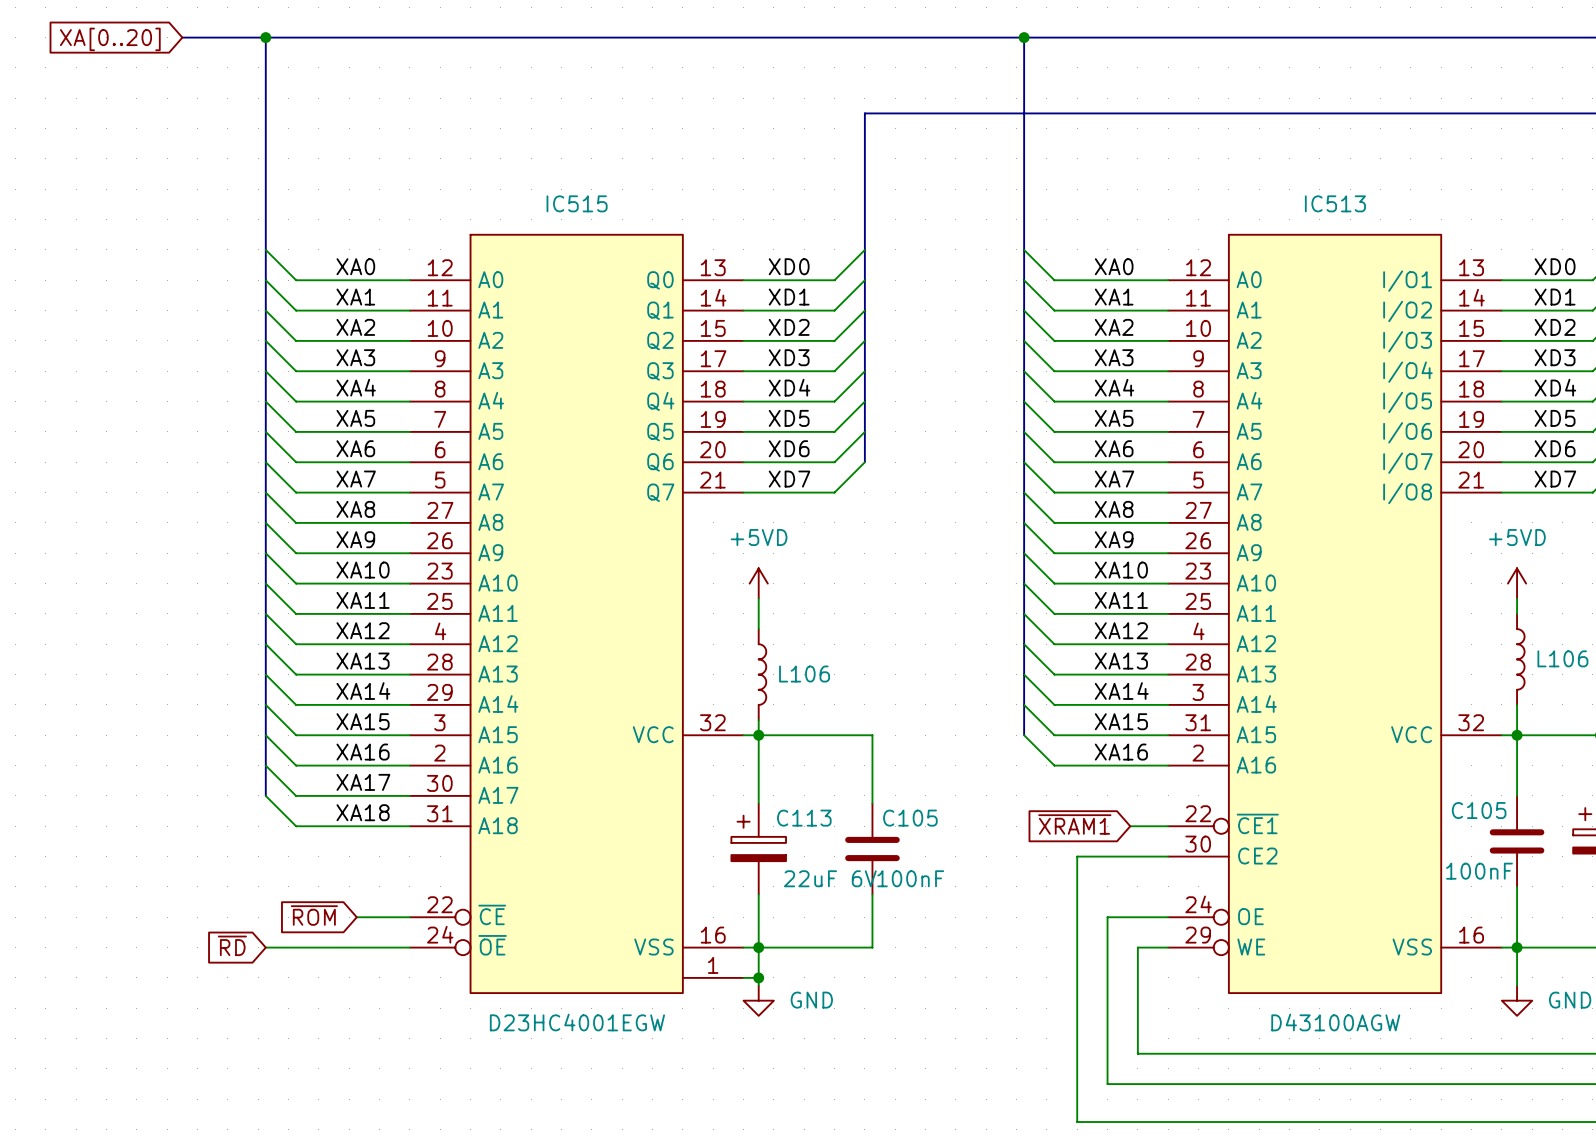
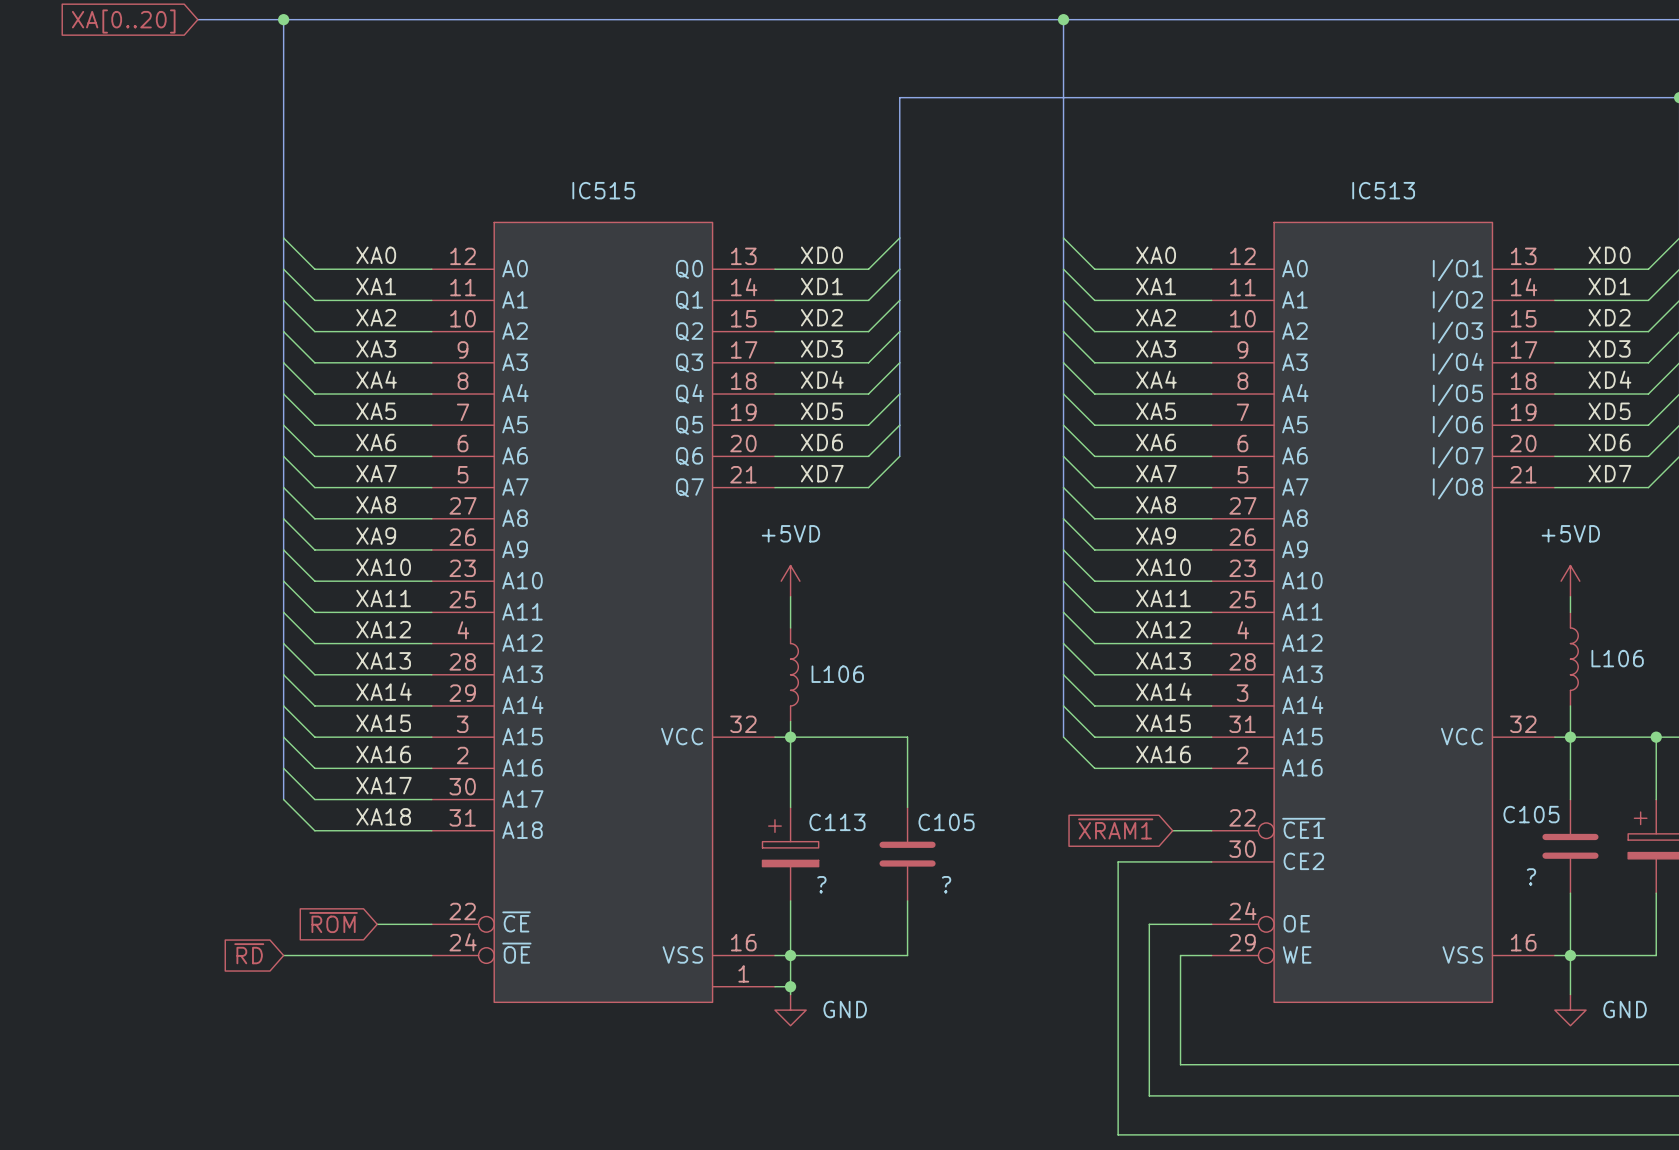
C105 value: 100nF (1479, 871) -> ? (1531, 876)
C113 value: 22uF 6V (830, 878) -> ? (821, 884)
C105 value: 100nF (910, 878) -> ? (946, 884)
IC515 value: D23HC4001EGW (577, 1022) -> none
IC513 value: D43100AGW (1335, 1022) -> none

